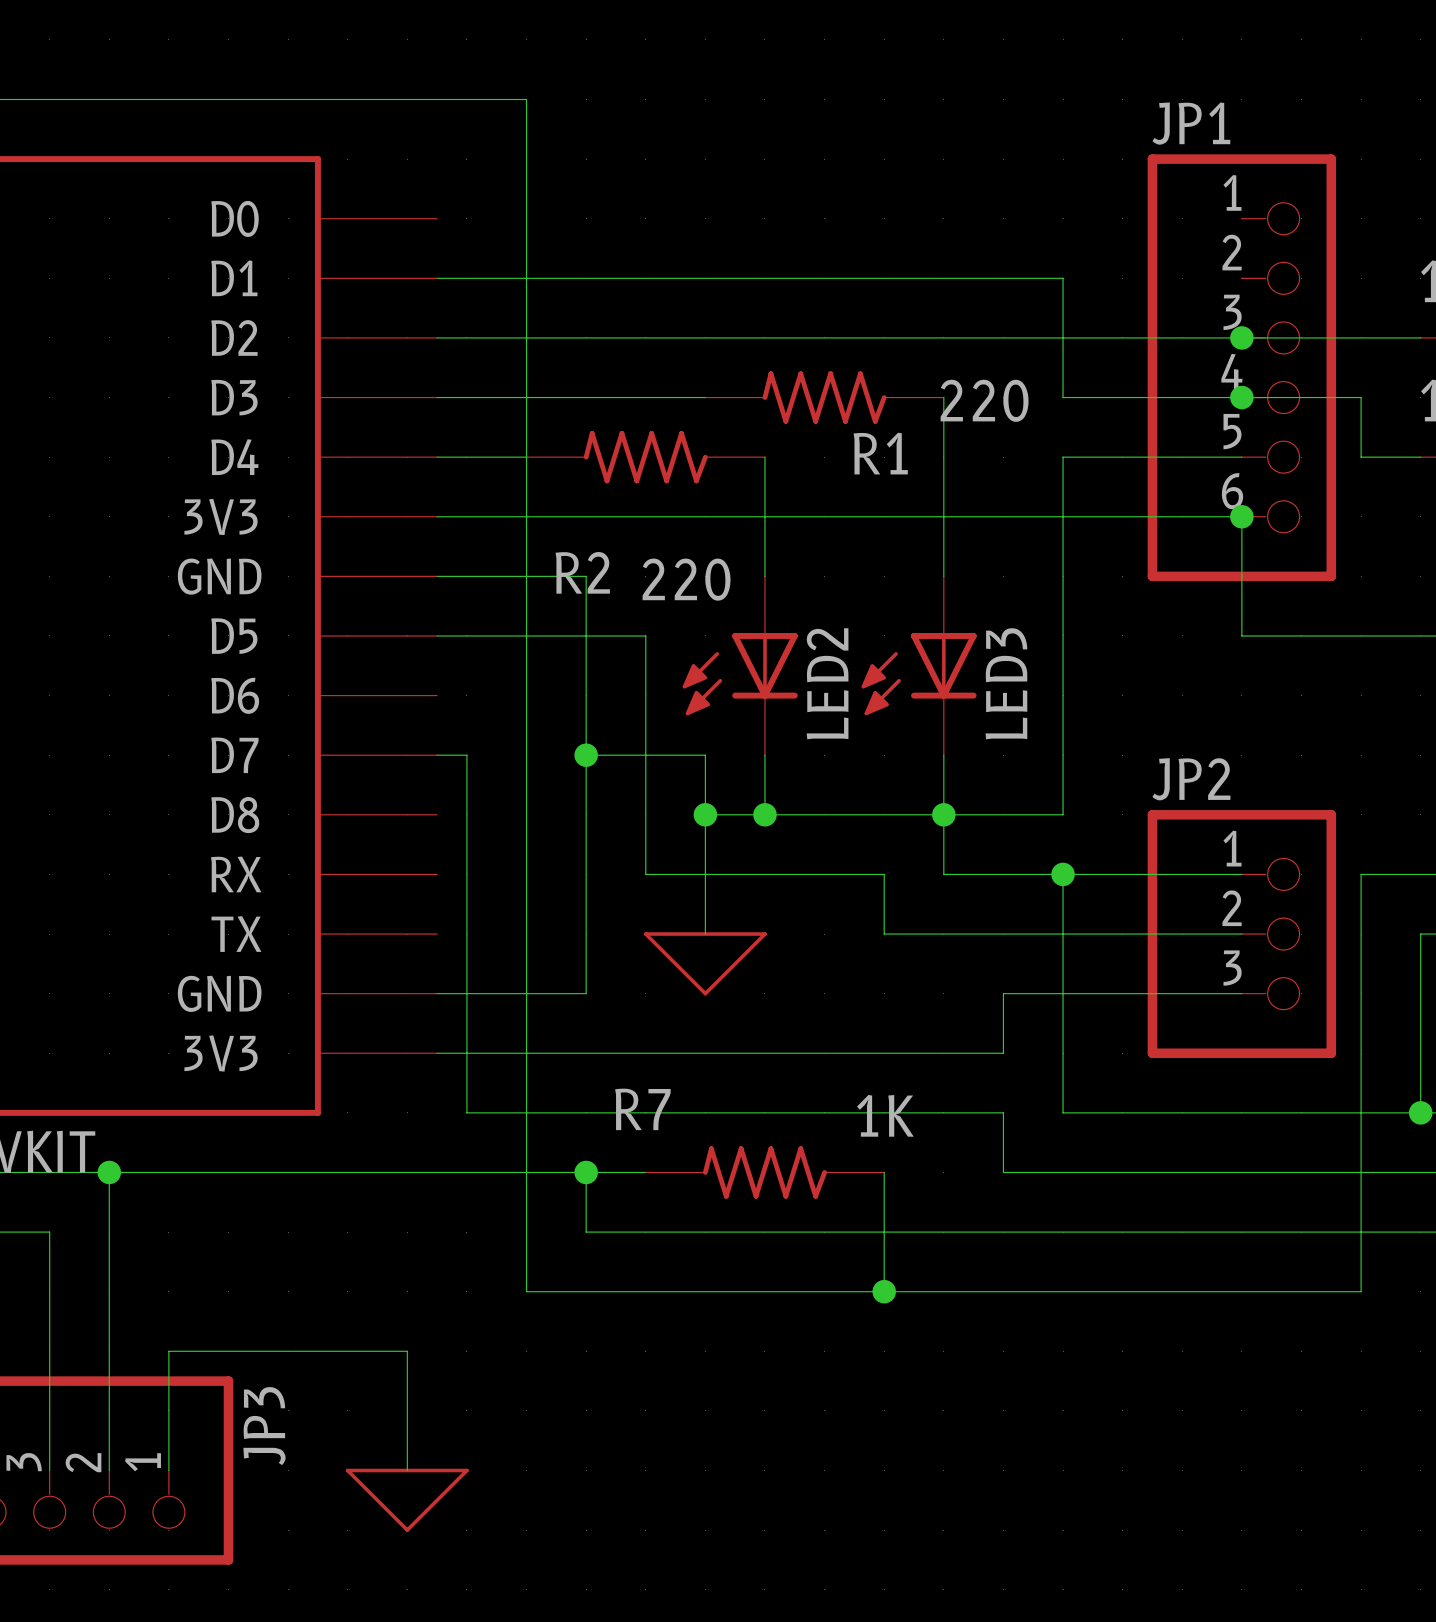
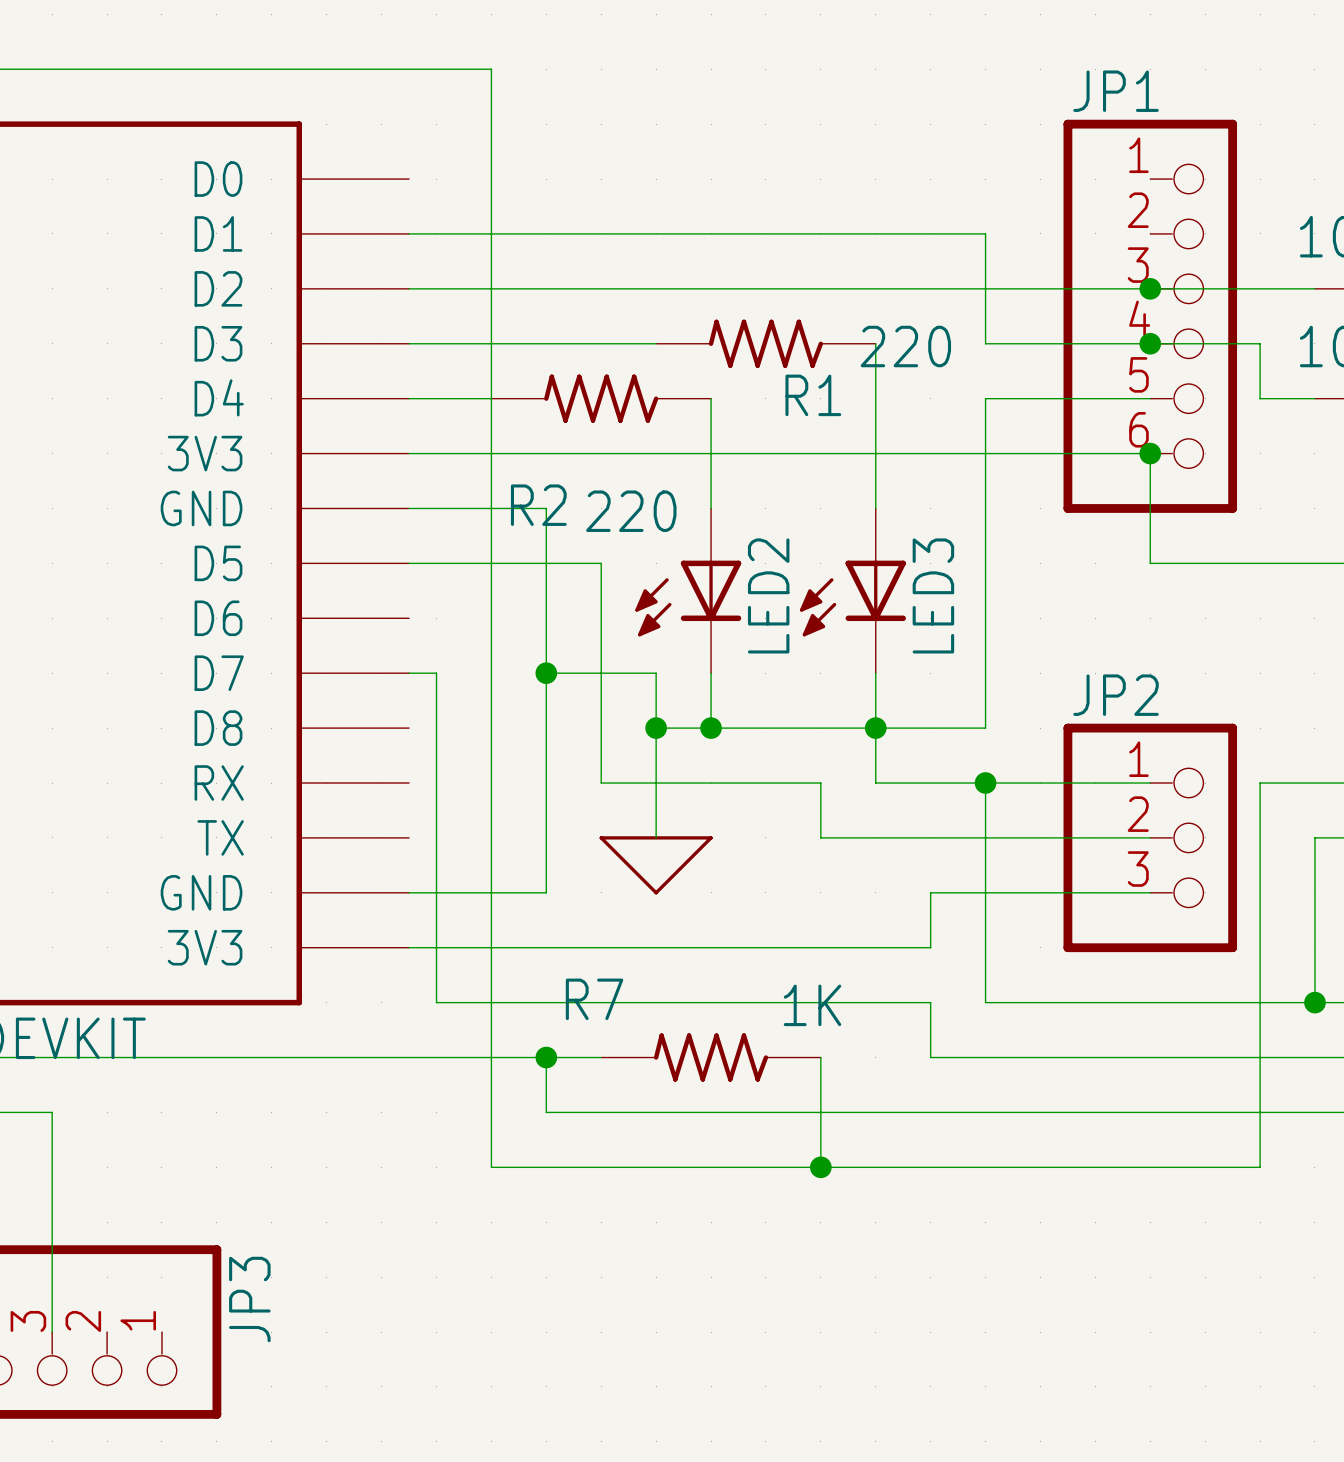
wire: (109, 1172) (109, 1470) -> none
junction: (109, 1172) -> none
wire: (168, 1470) (168, 1351) (407, 1351) (407, 1470) -> none
power symbol: (407, 1500) -> none

